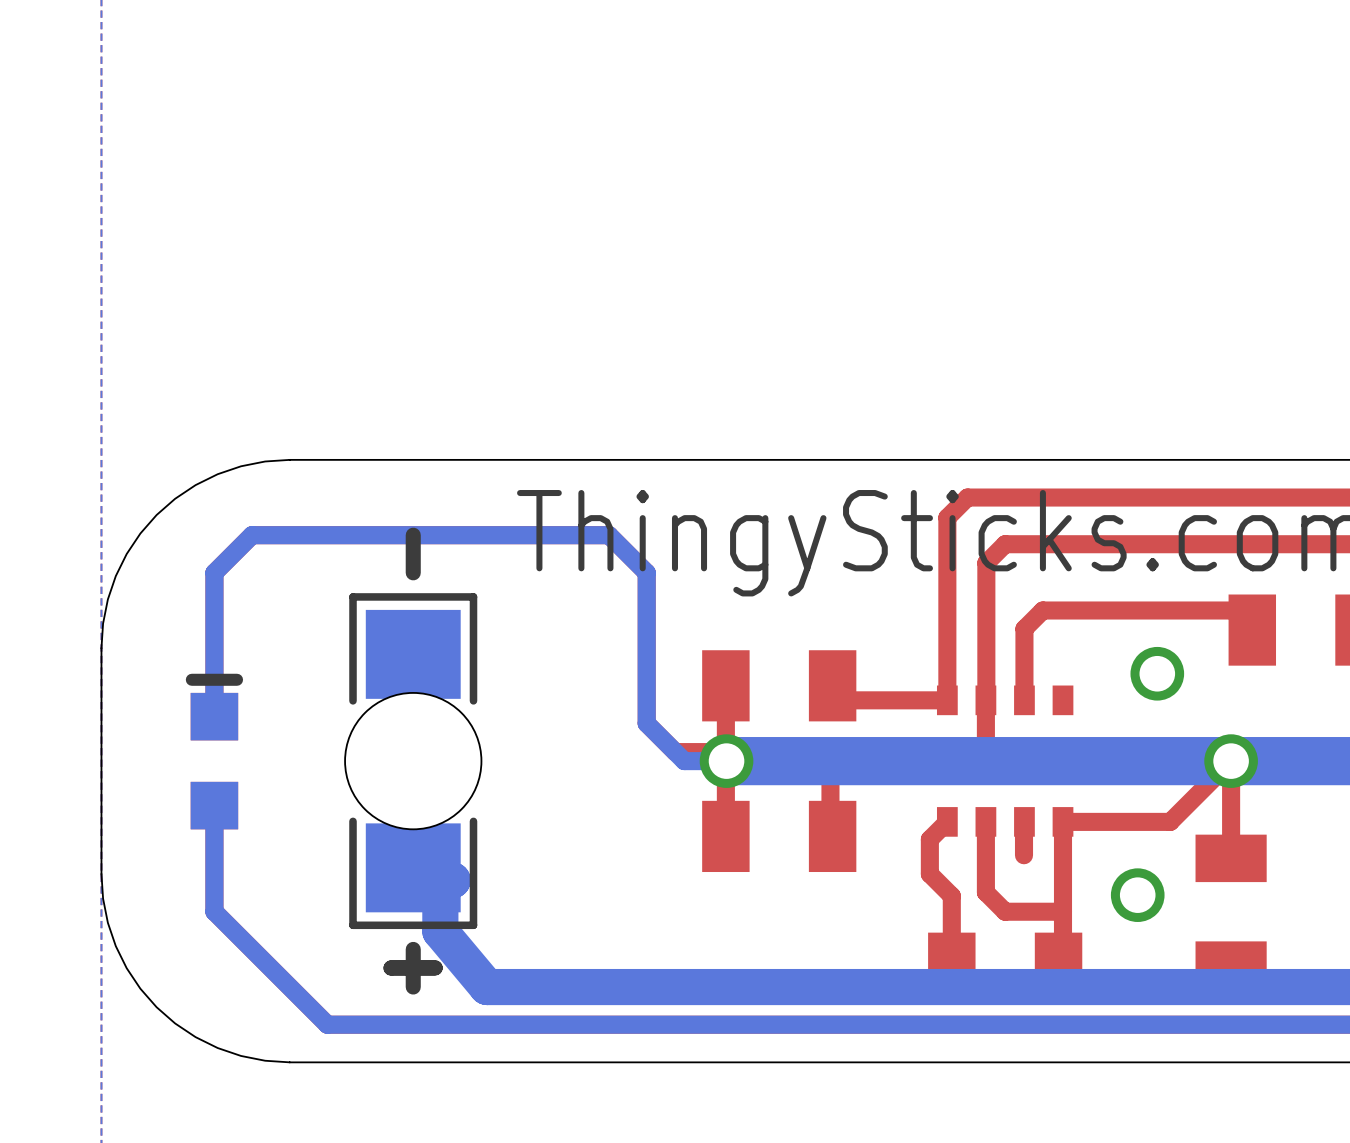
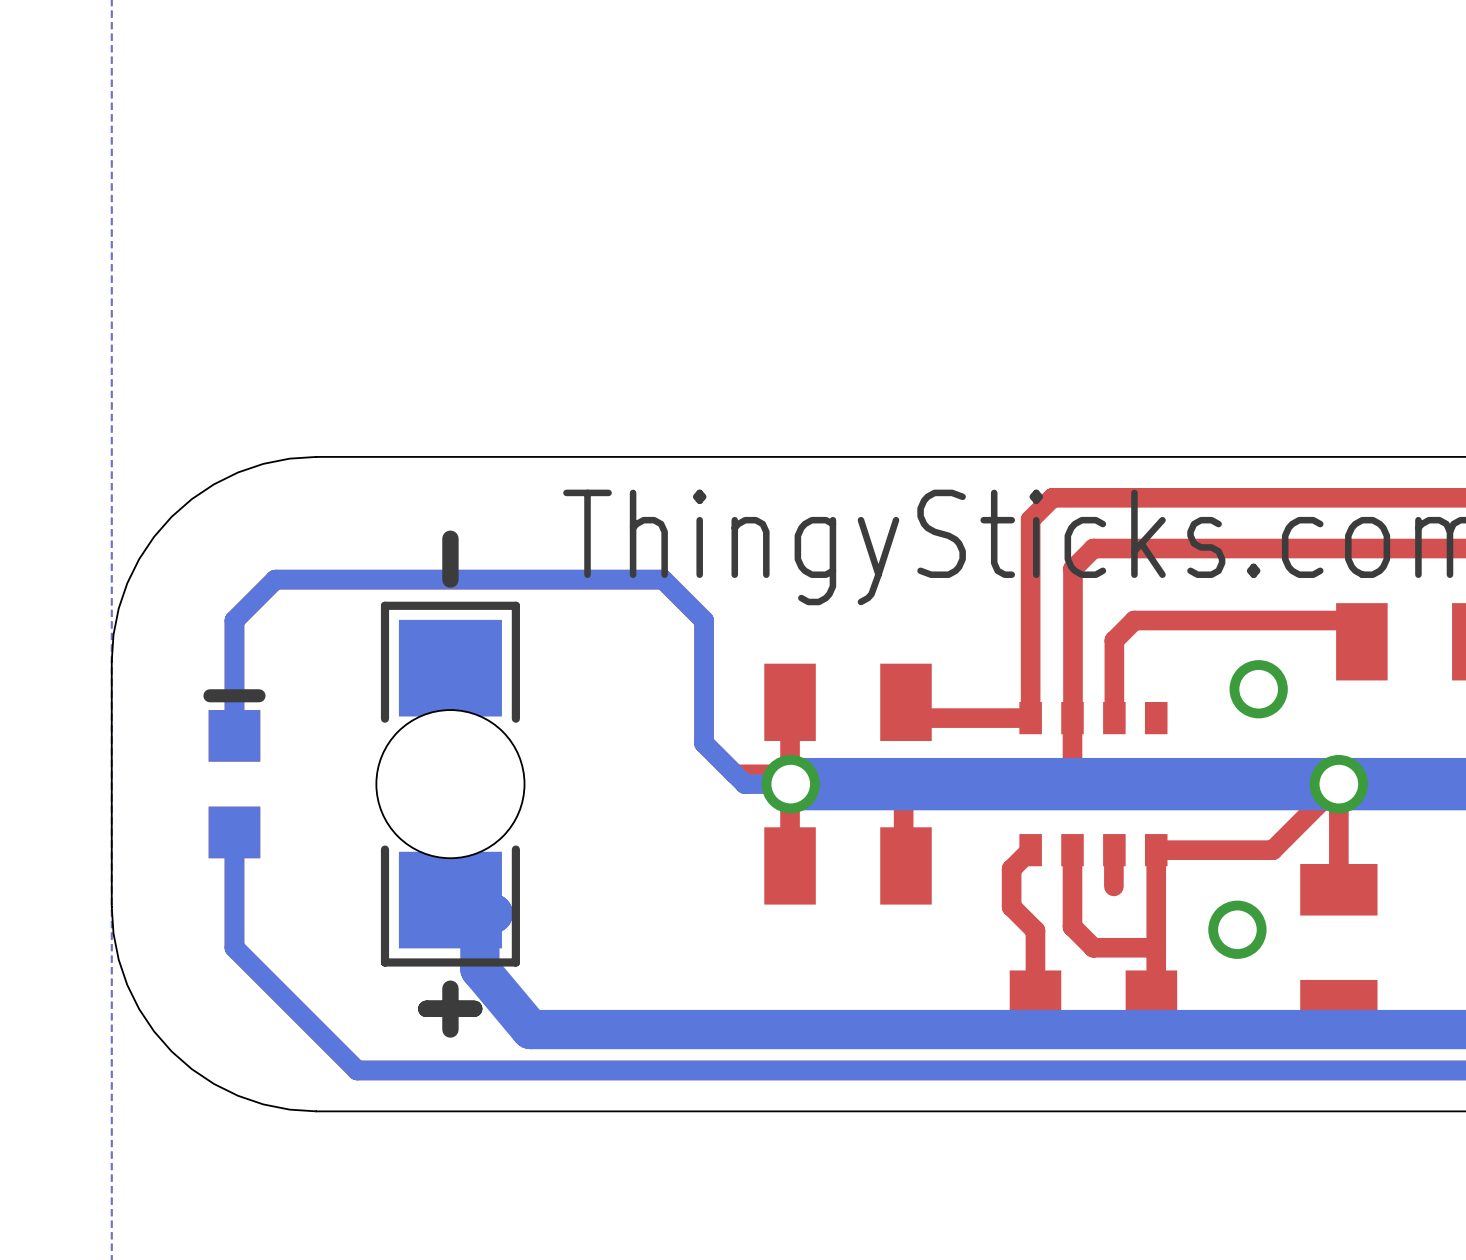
bottom track: (646, 610) (646, 572) (609, 535) (252, 535) (214, 572) (214, 610) -> (704, 620) (663, 579) (275, 579) (234, 620)

